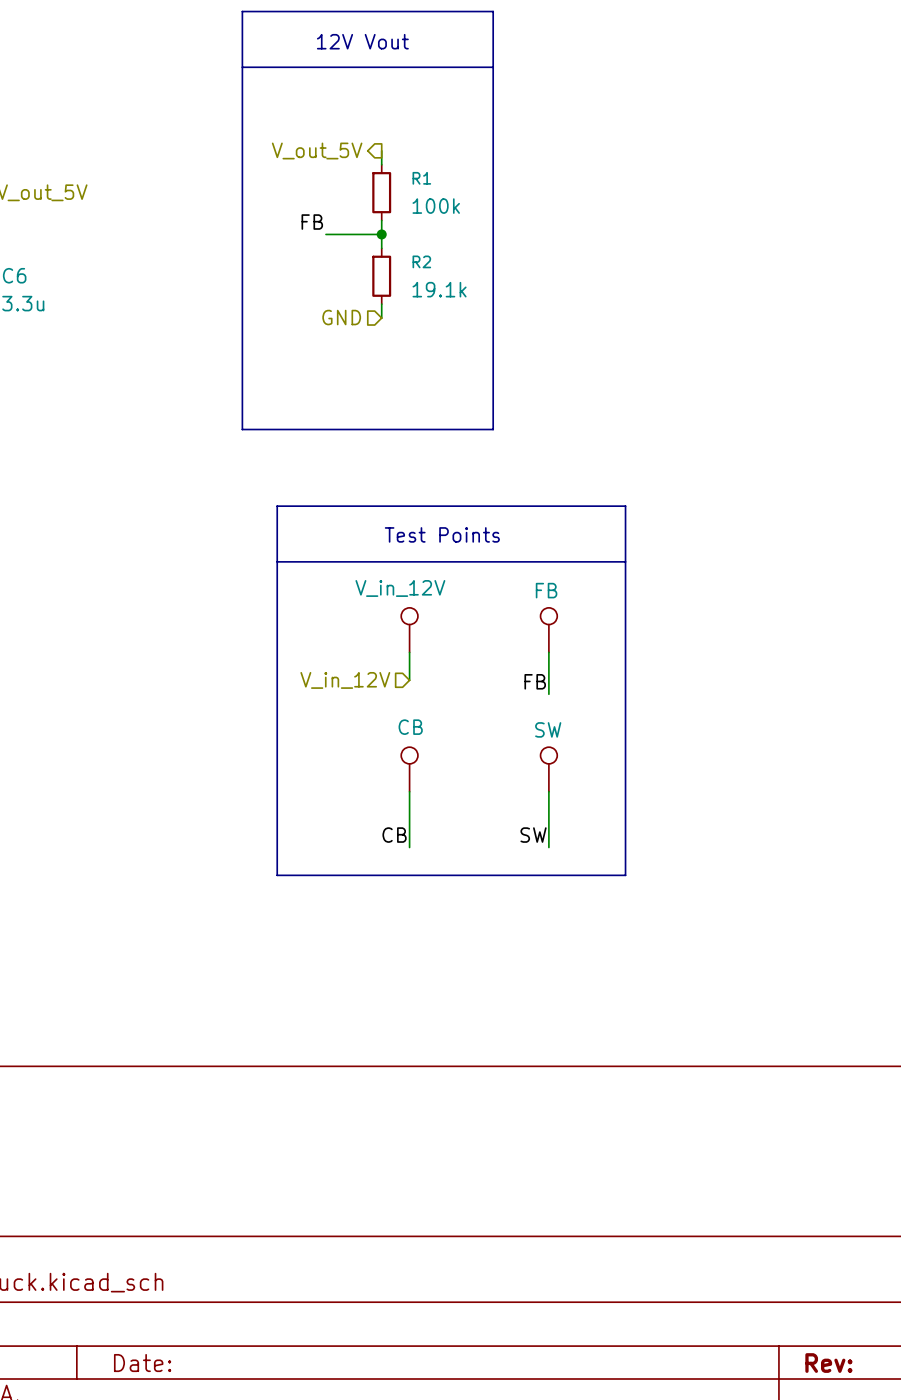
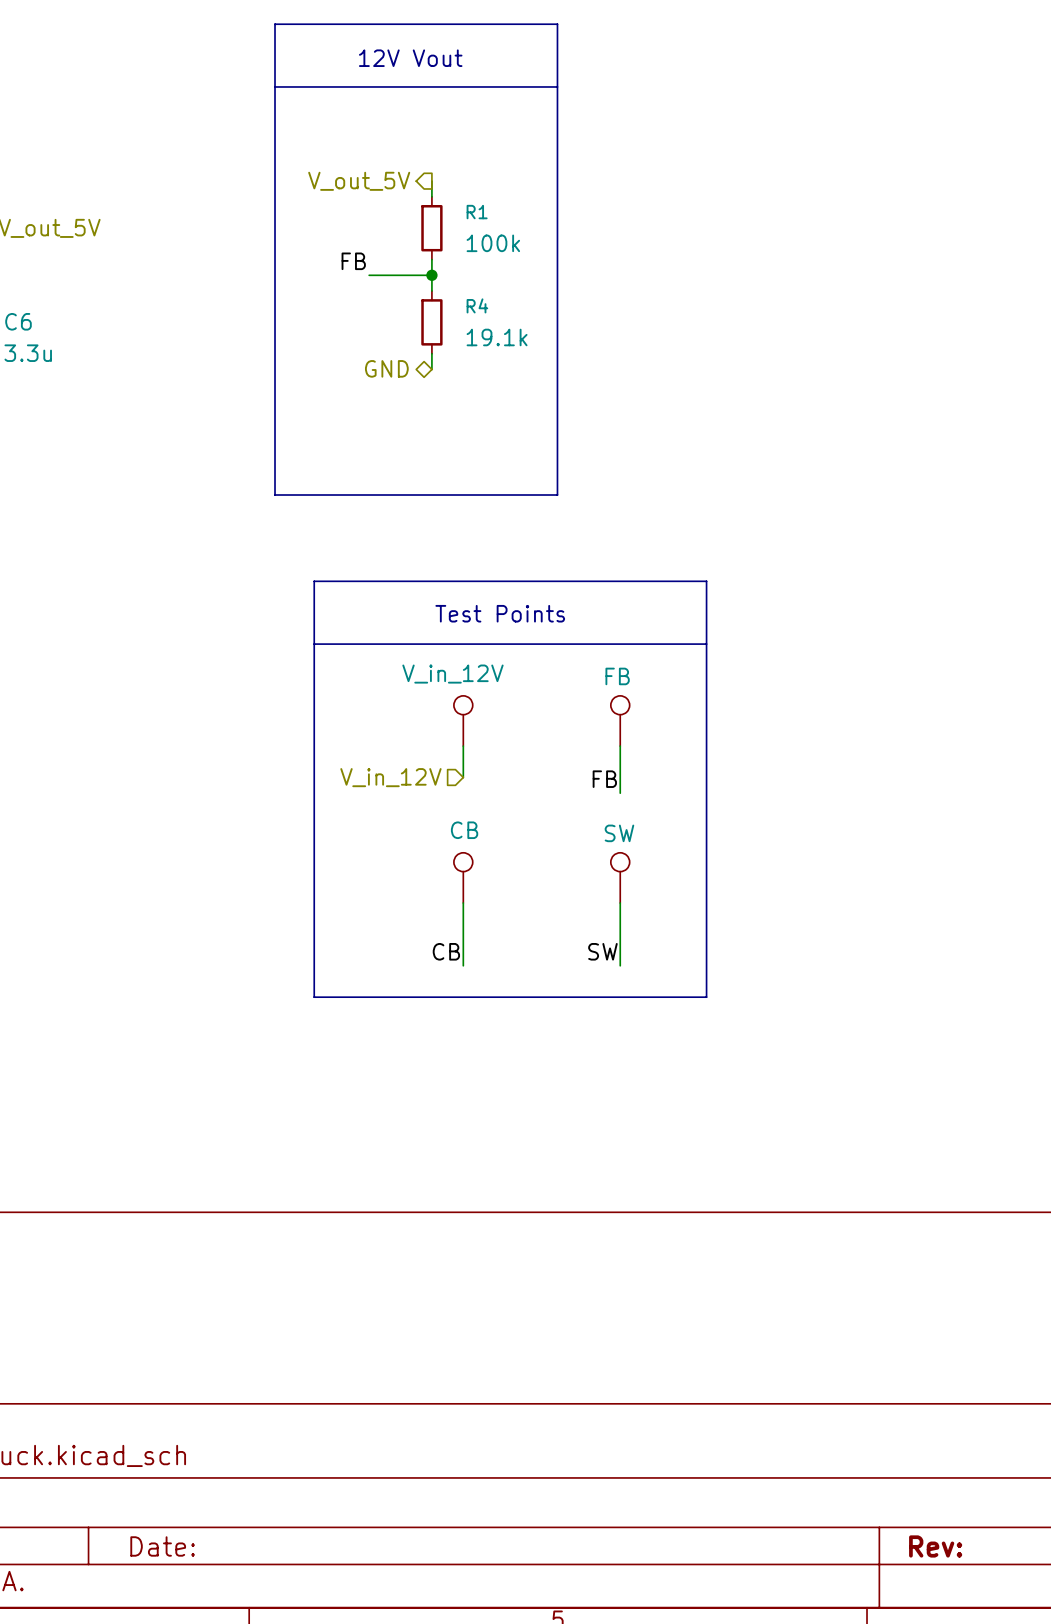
R2 name: R2 (421, 261) -> R4 (477, 305)
hierarchical label shape: input (341, 317) -> bidirectional (386, 368)

